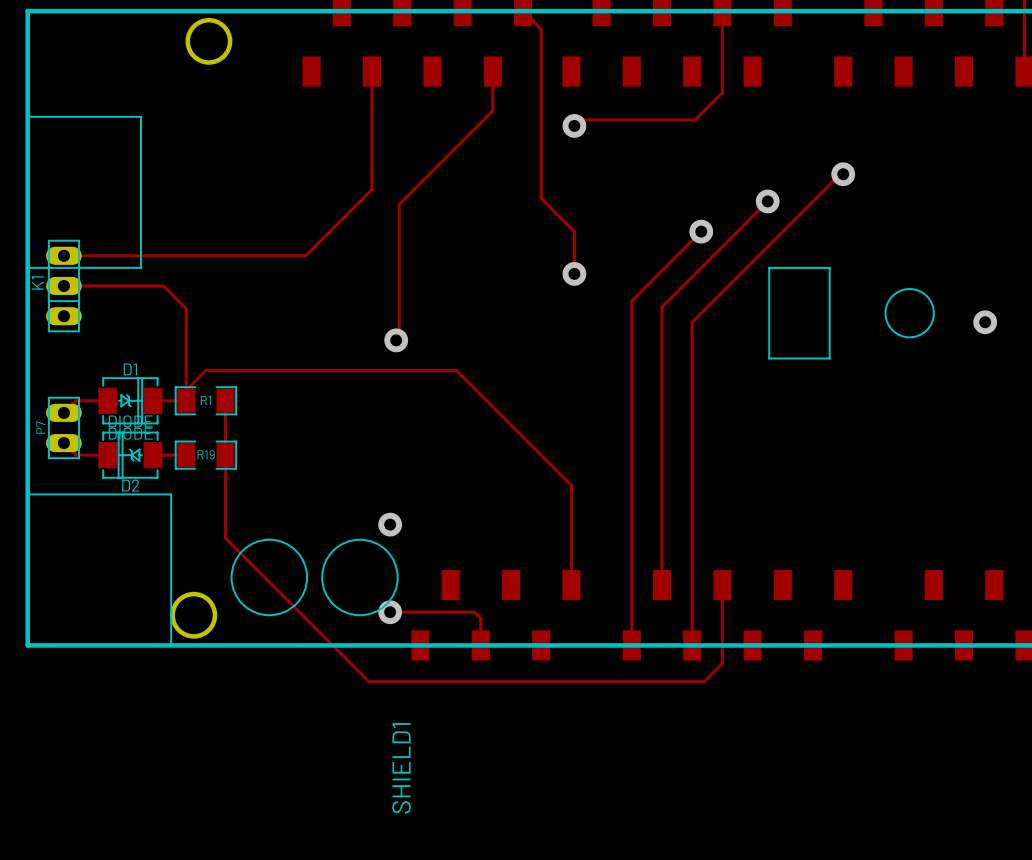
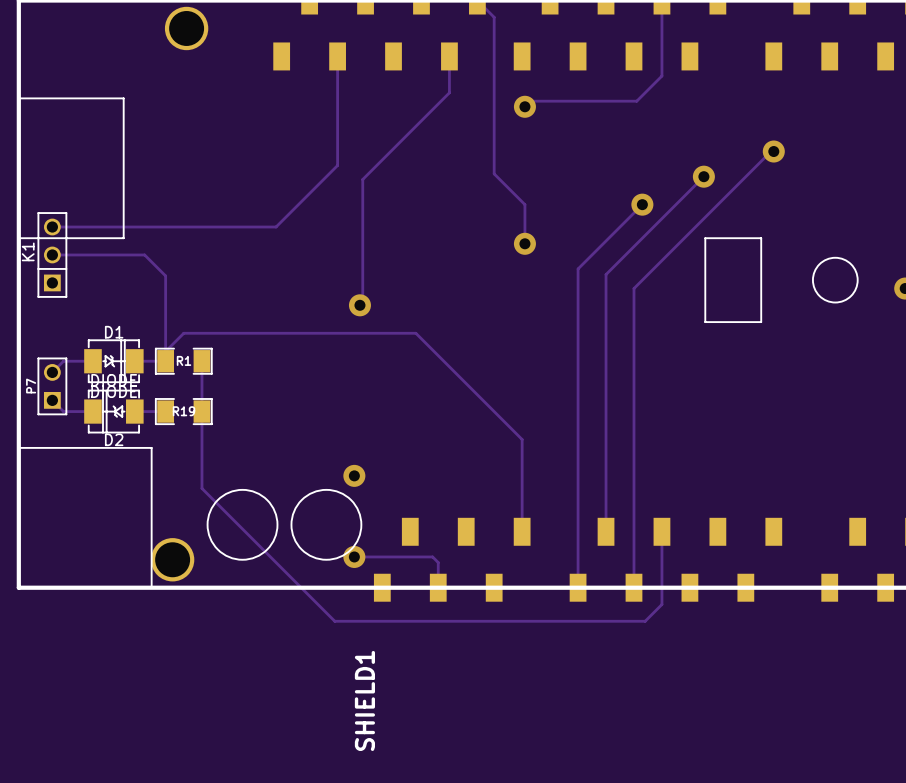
K1 footprint: [46, 239, 82, 333] -> [37, 212, 68, 298]
P7 footprint: [46, 396, 82, 460] -> [37, 357, 68, 416]

